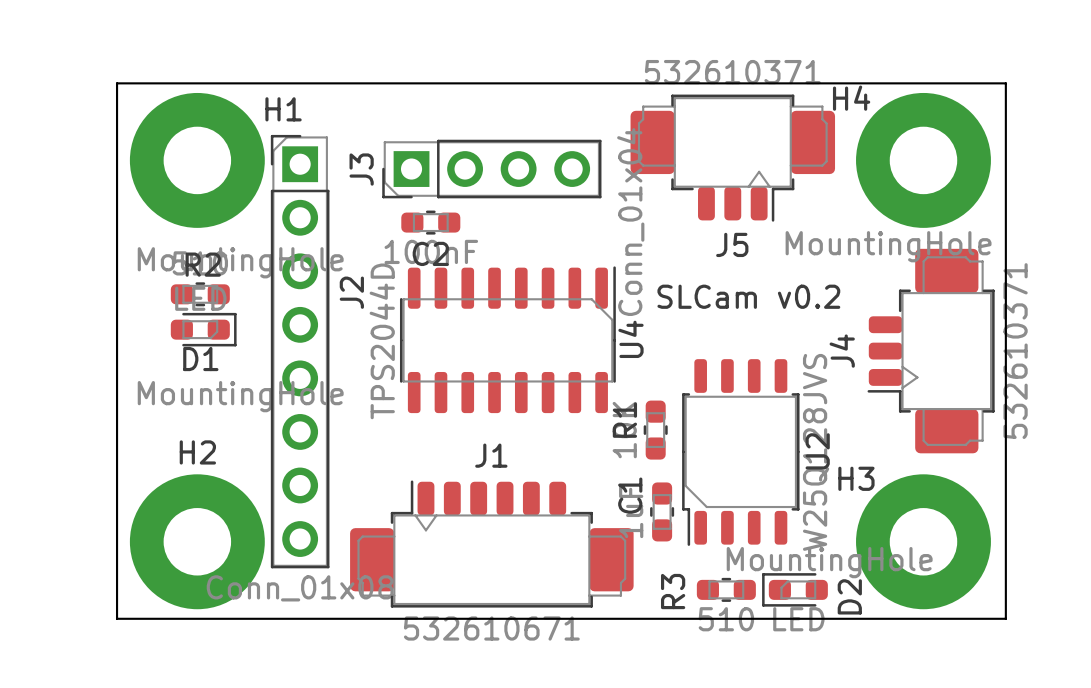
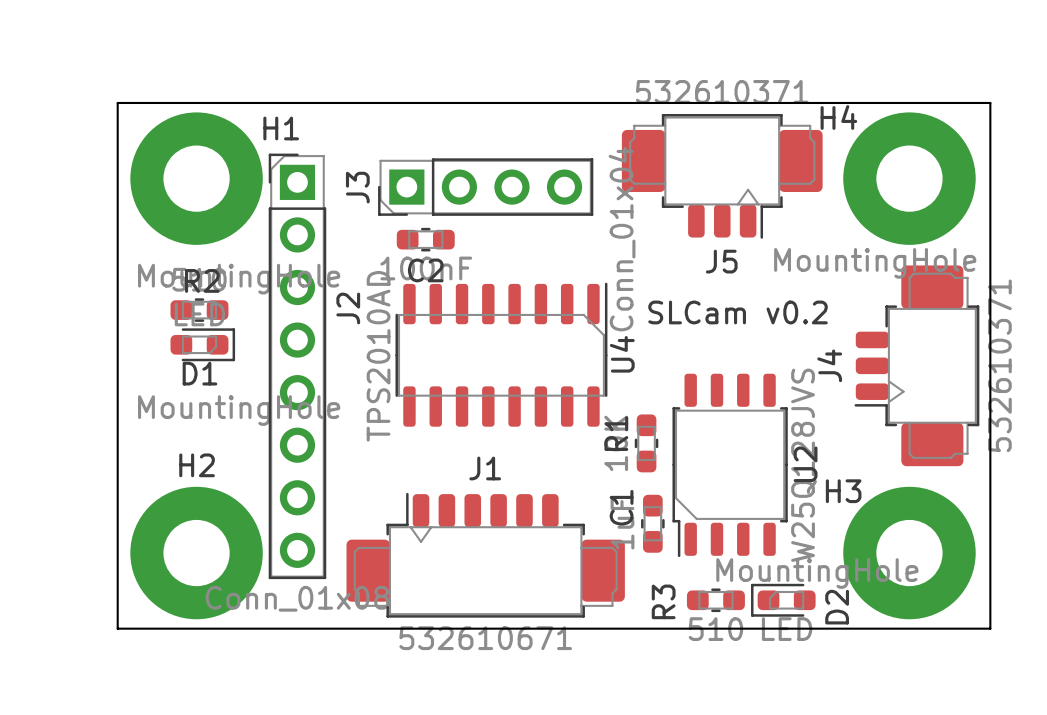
U4 value: TPS2044D (382, 341) -> TPS2010AD (378, 356)

